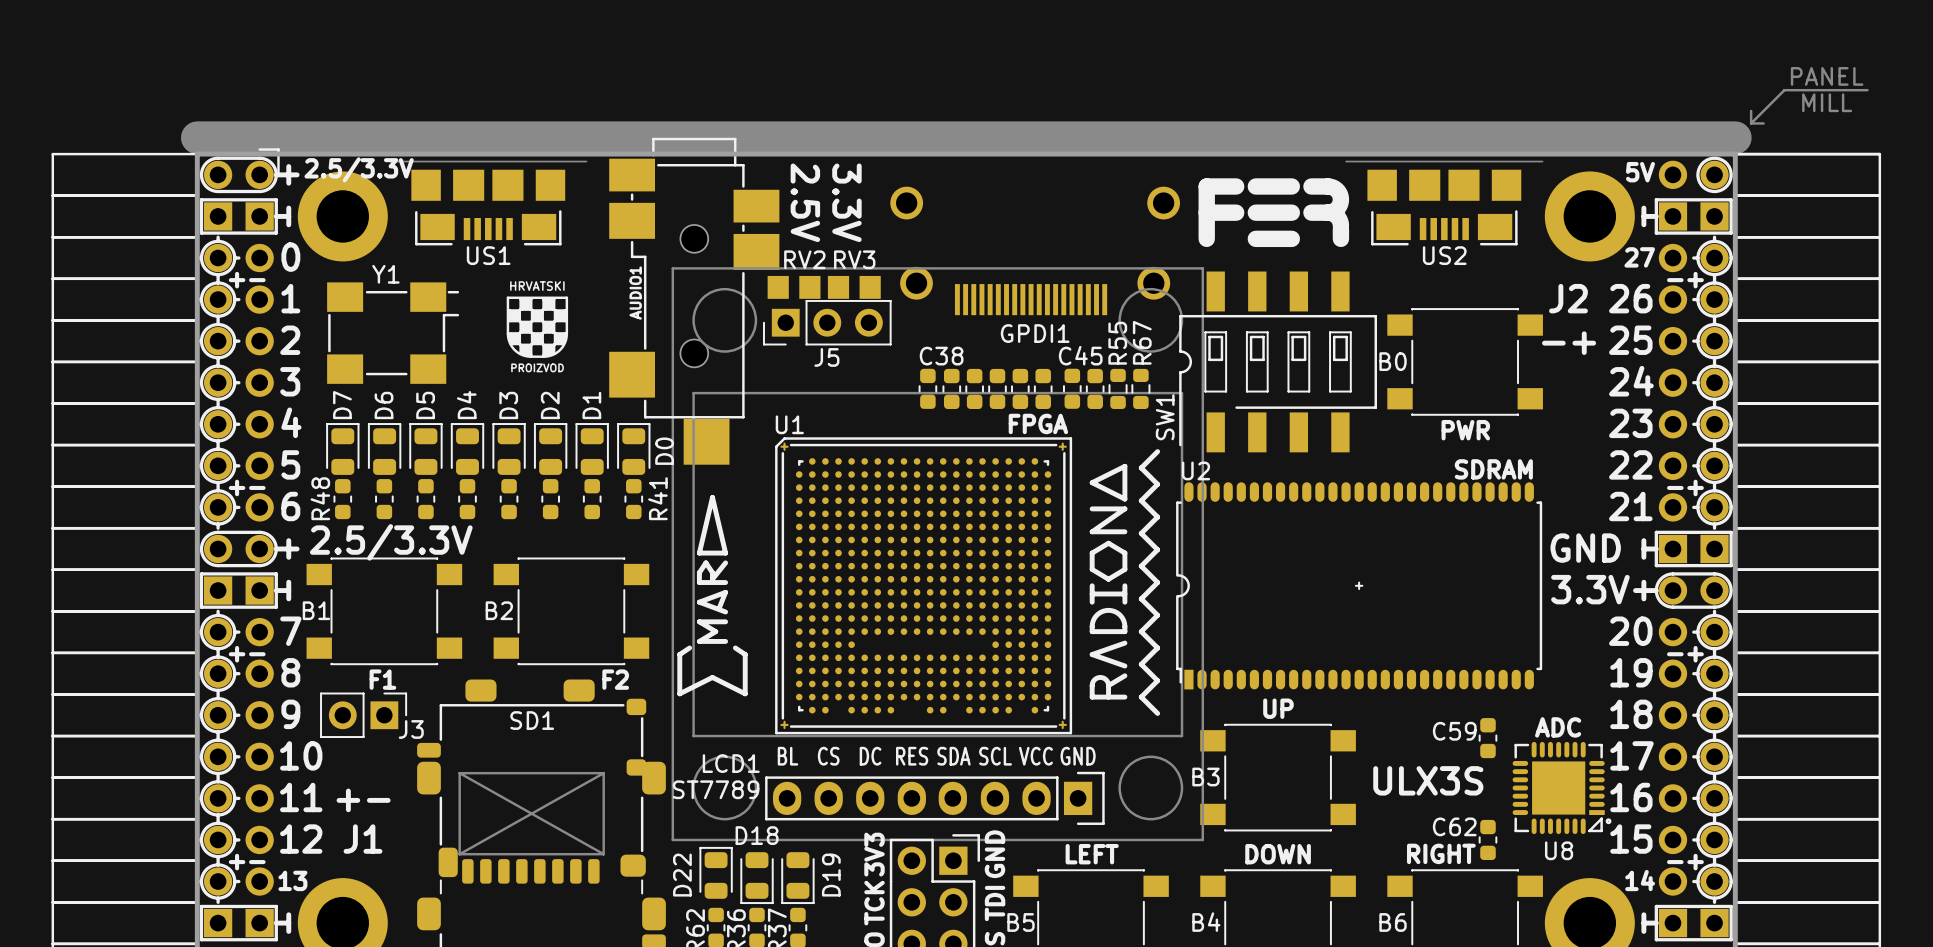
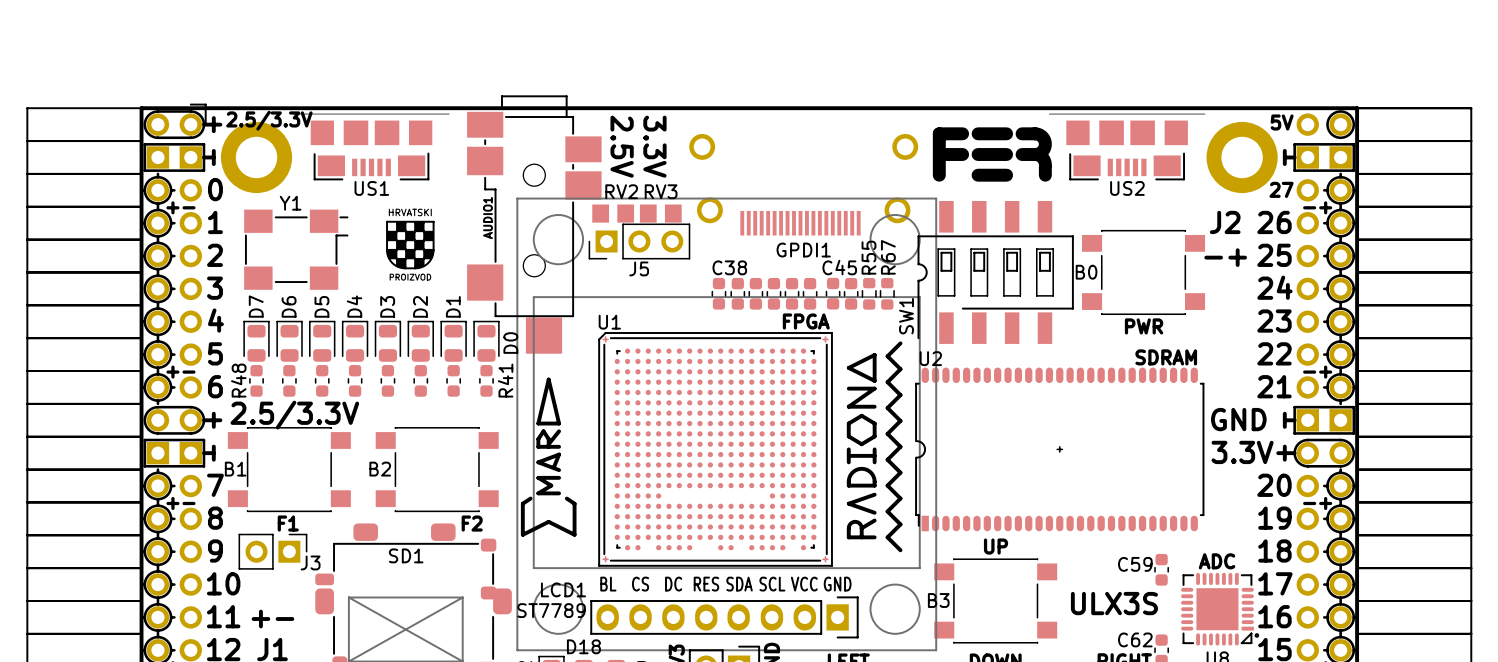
text: PANEL (1827, 76) -> none
line: (1867, 90) (1784, 90) (1751, 123) -> none
text: MILL (1827, 102) -> none
line: (1751, 110) (1751, 123) -> none
line: (1751, 123) (1763, 123) -> none
line: (197, 137) (1735, 137) -> none

